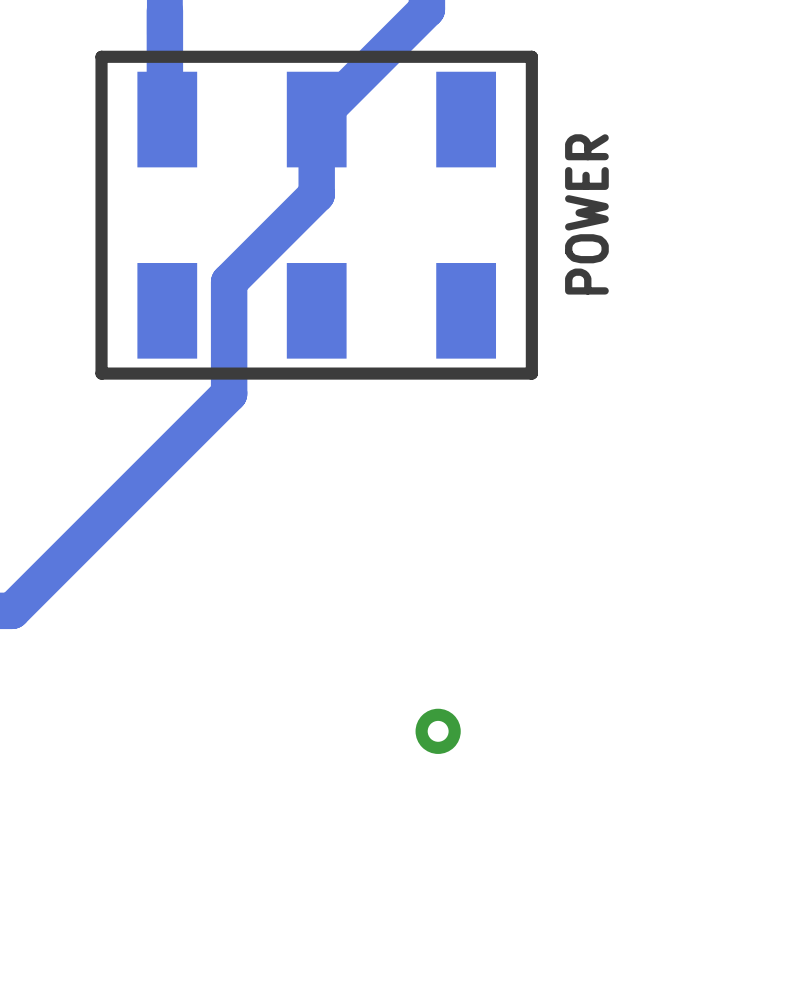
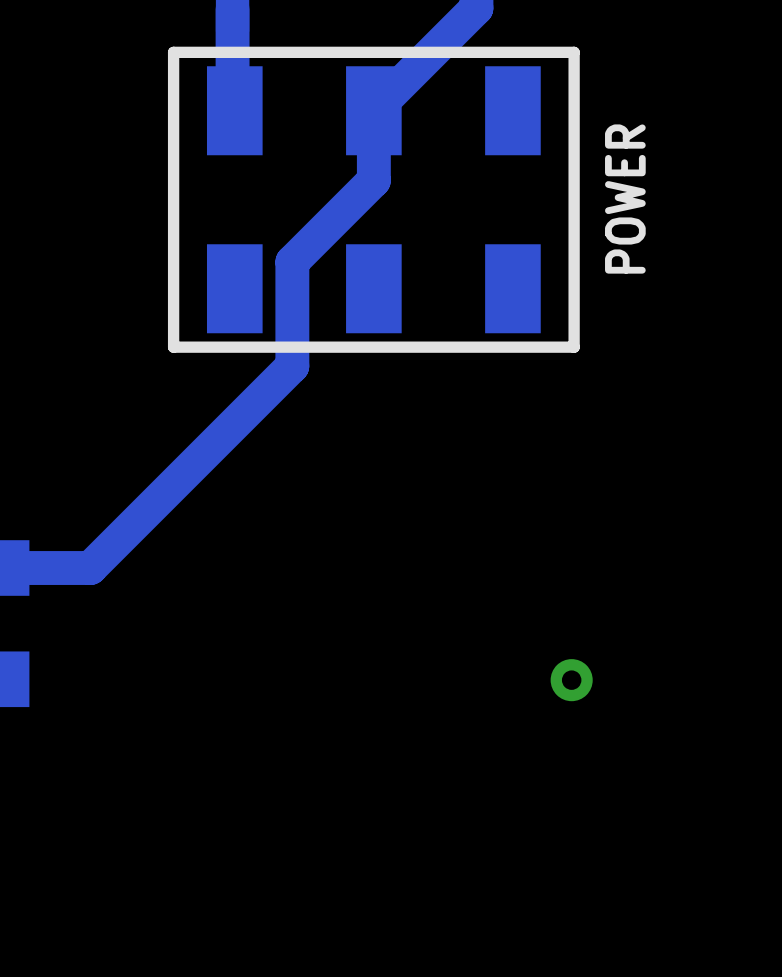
via position: (438, 731) -> (571, 680)

